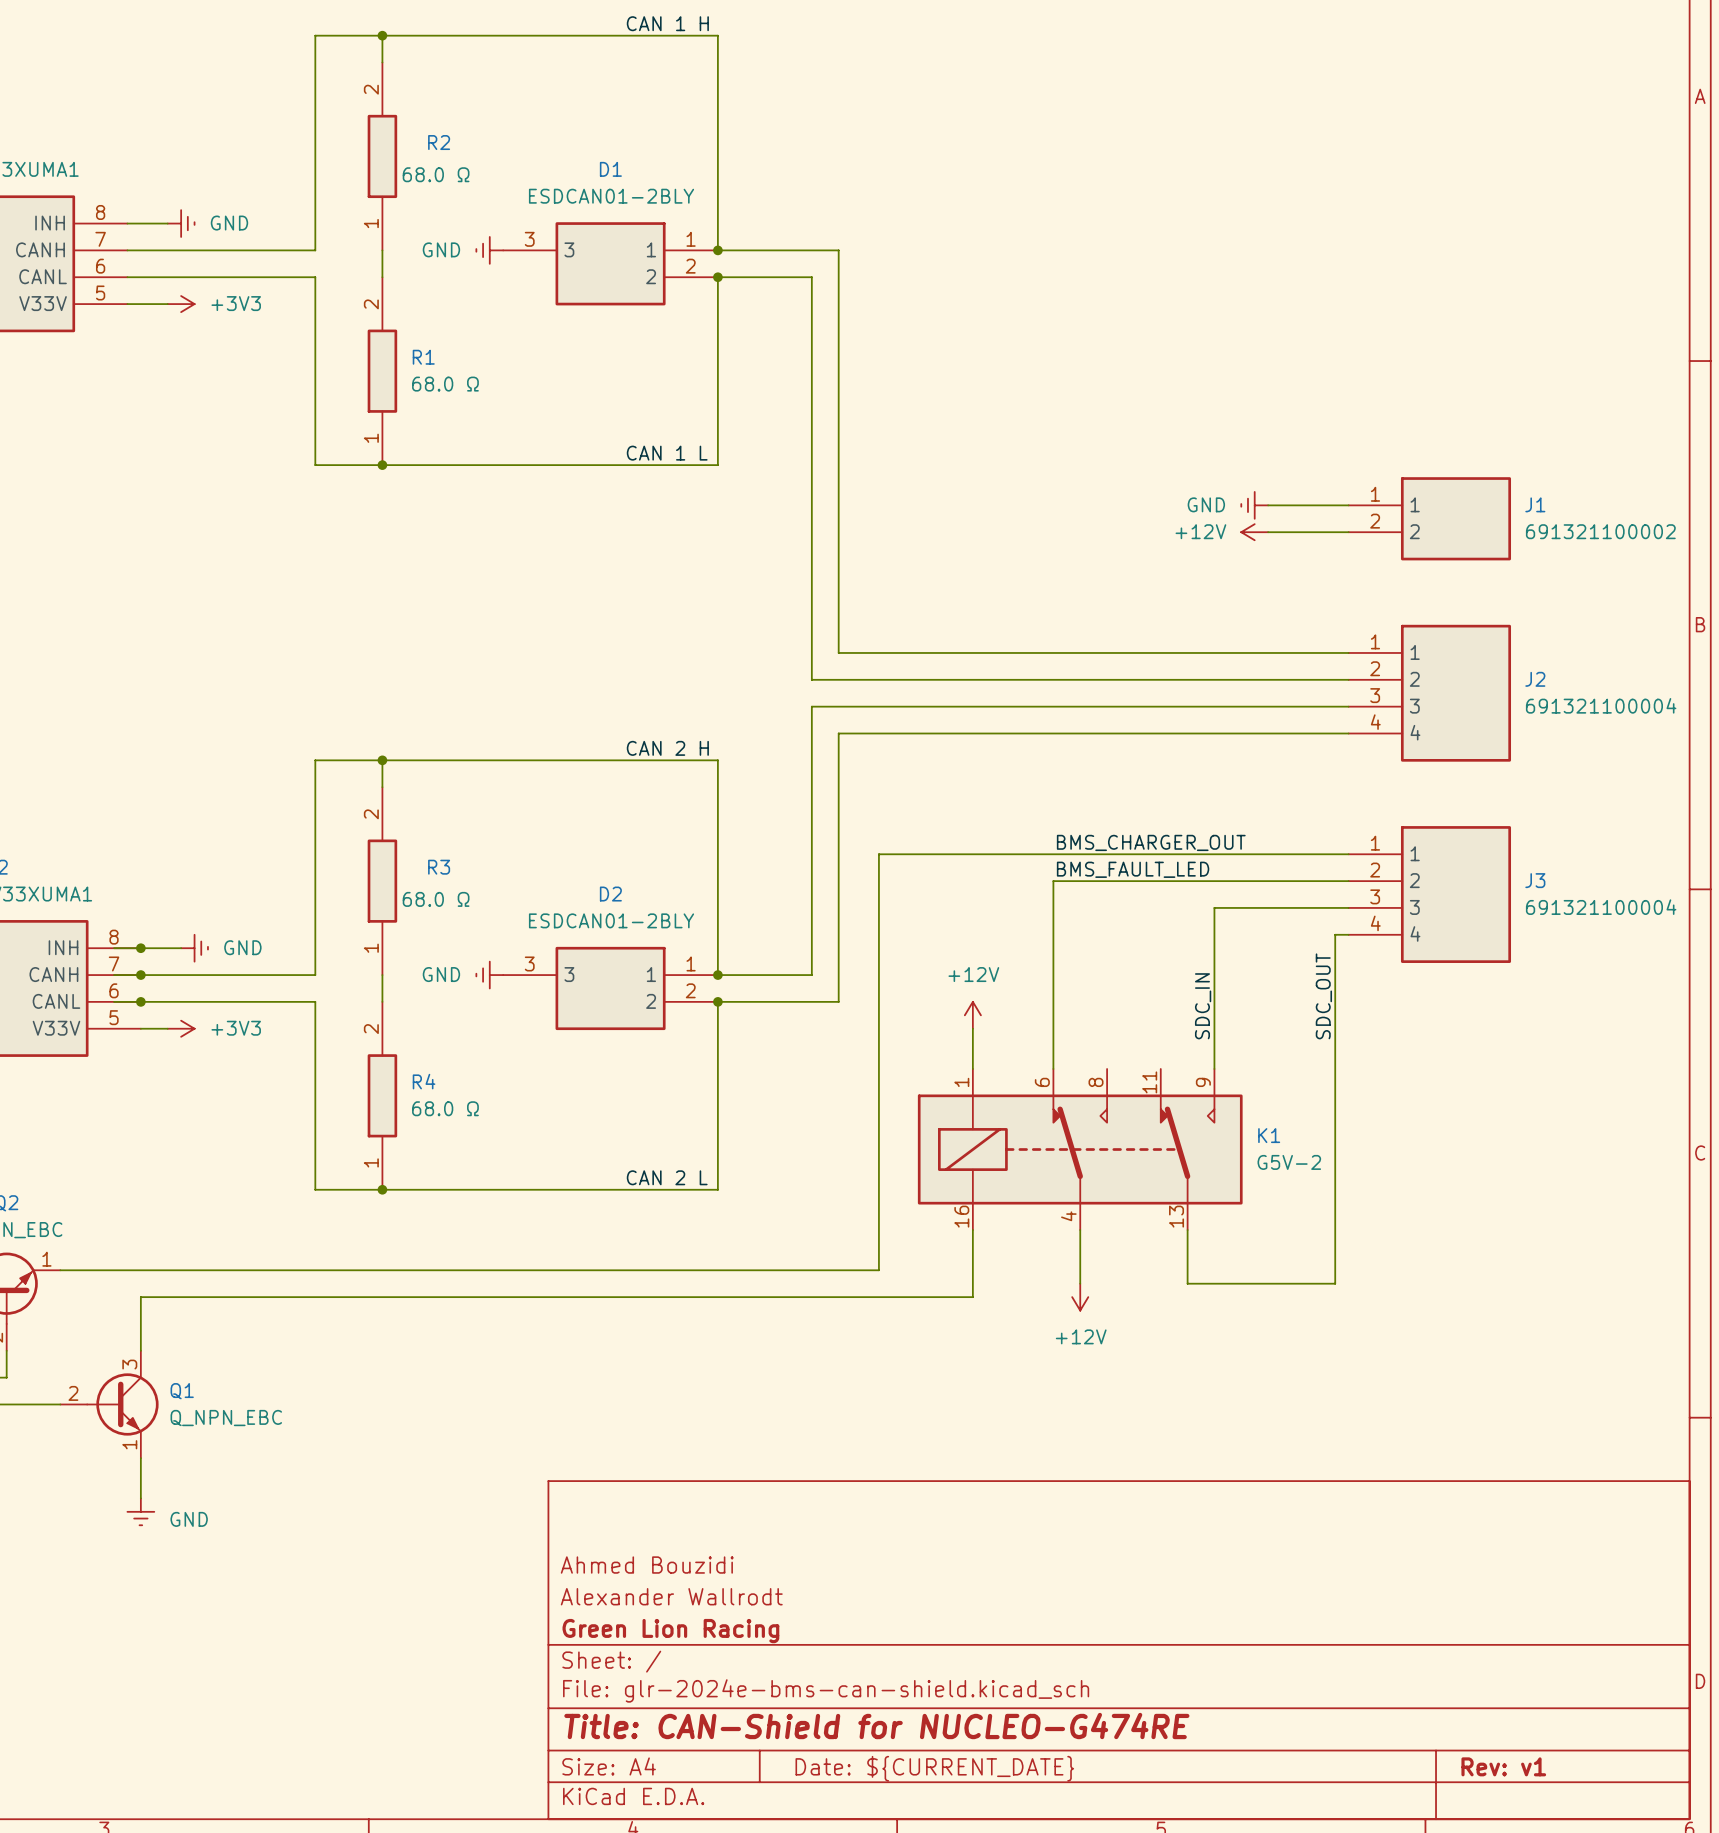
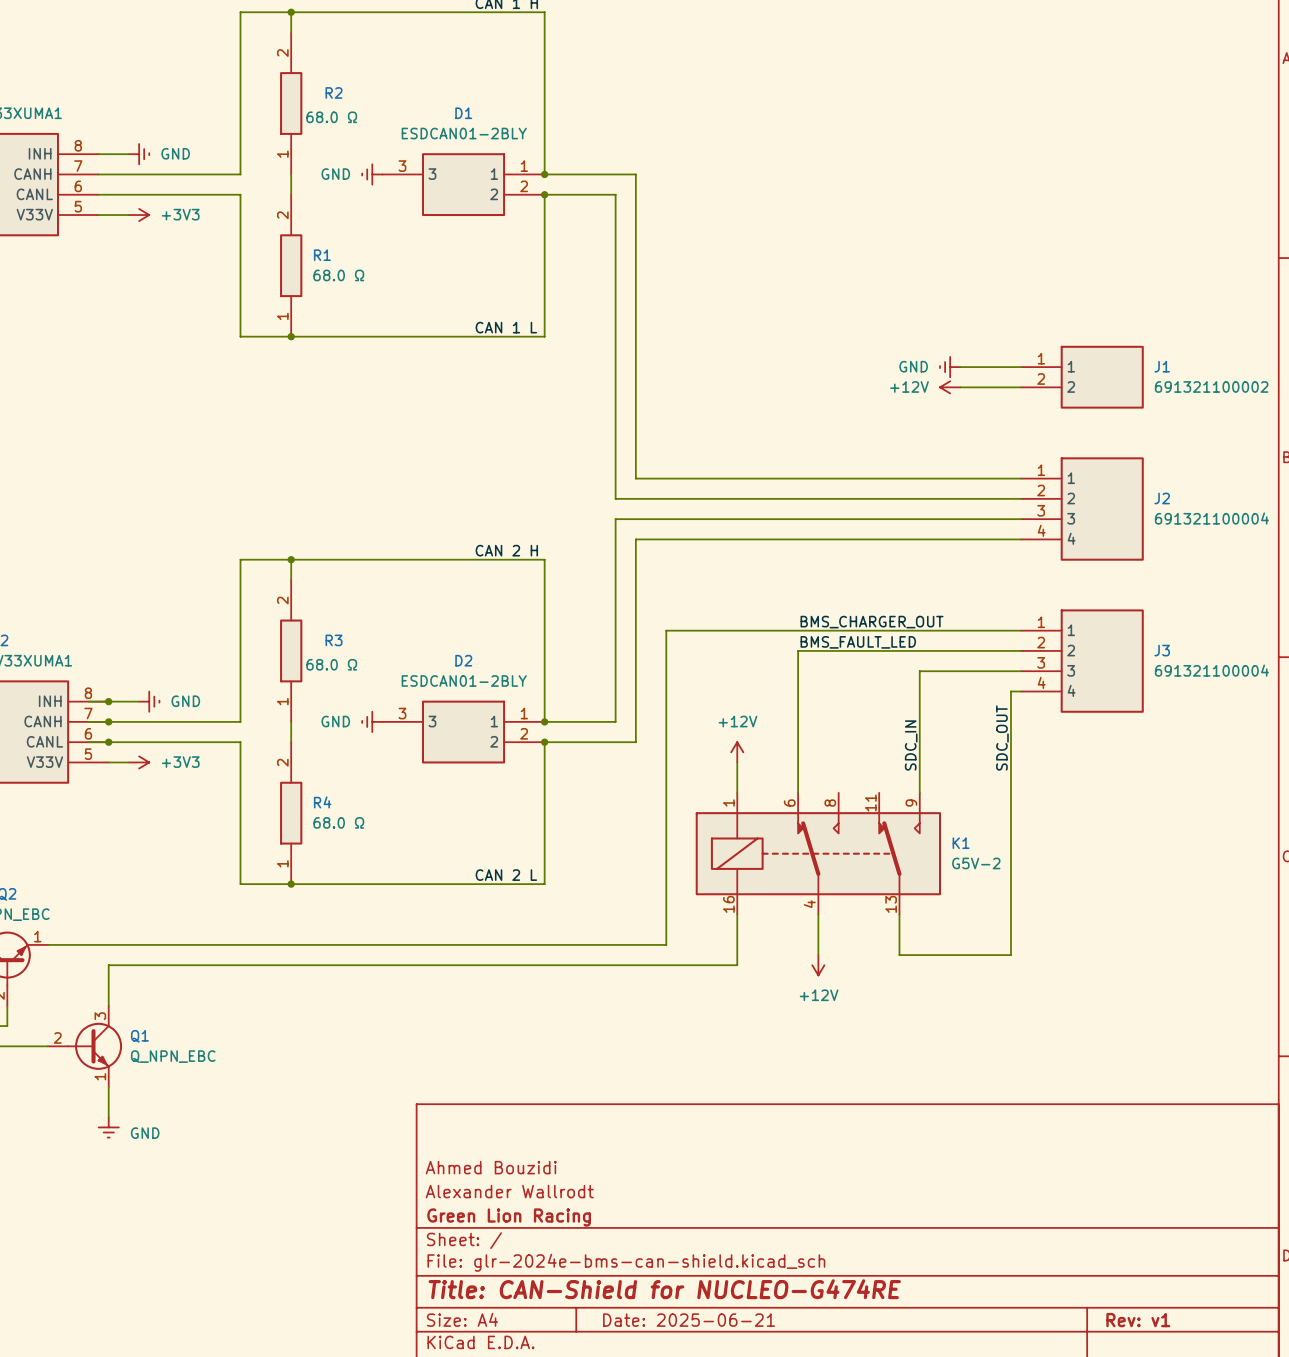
title block: Date: ${CURRENT_DATE} (934, 1768) -> Date: 2025-06-21 (689, 1320)

